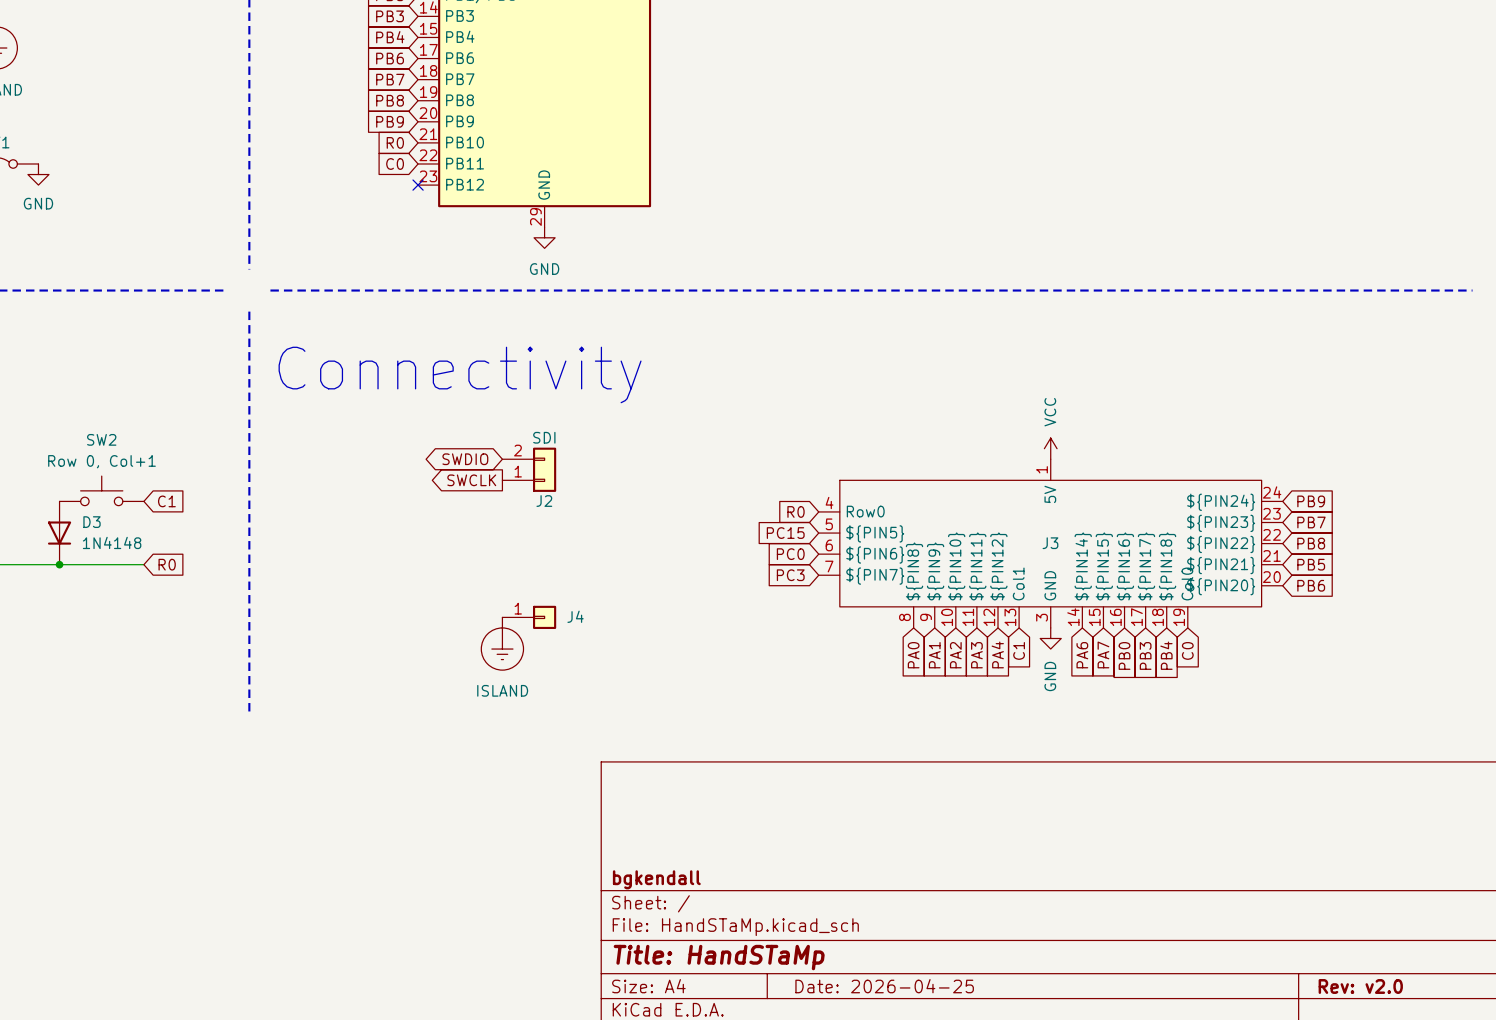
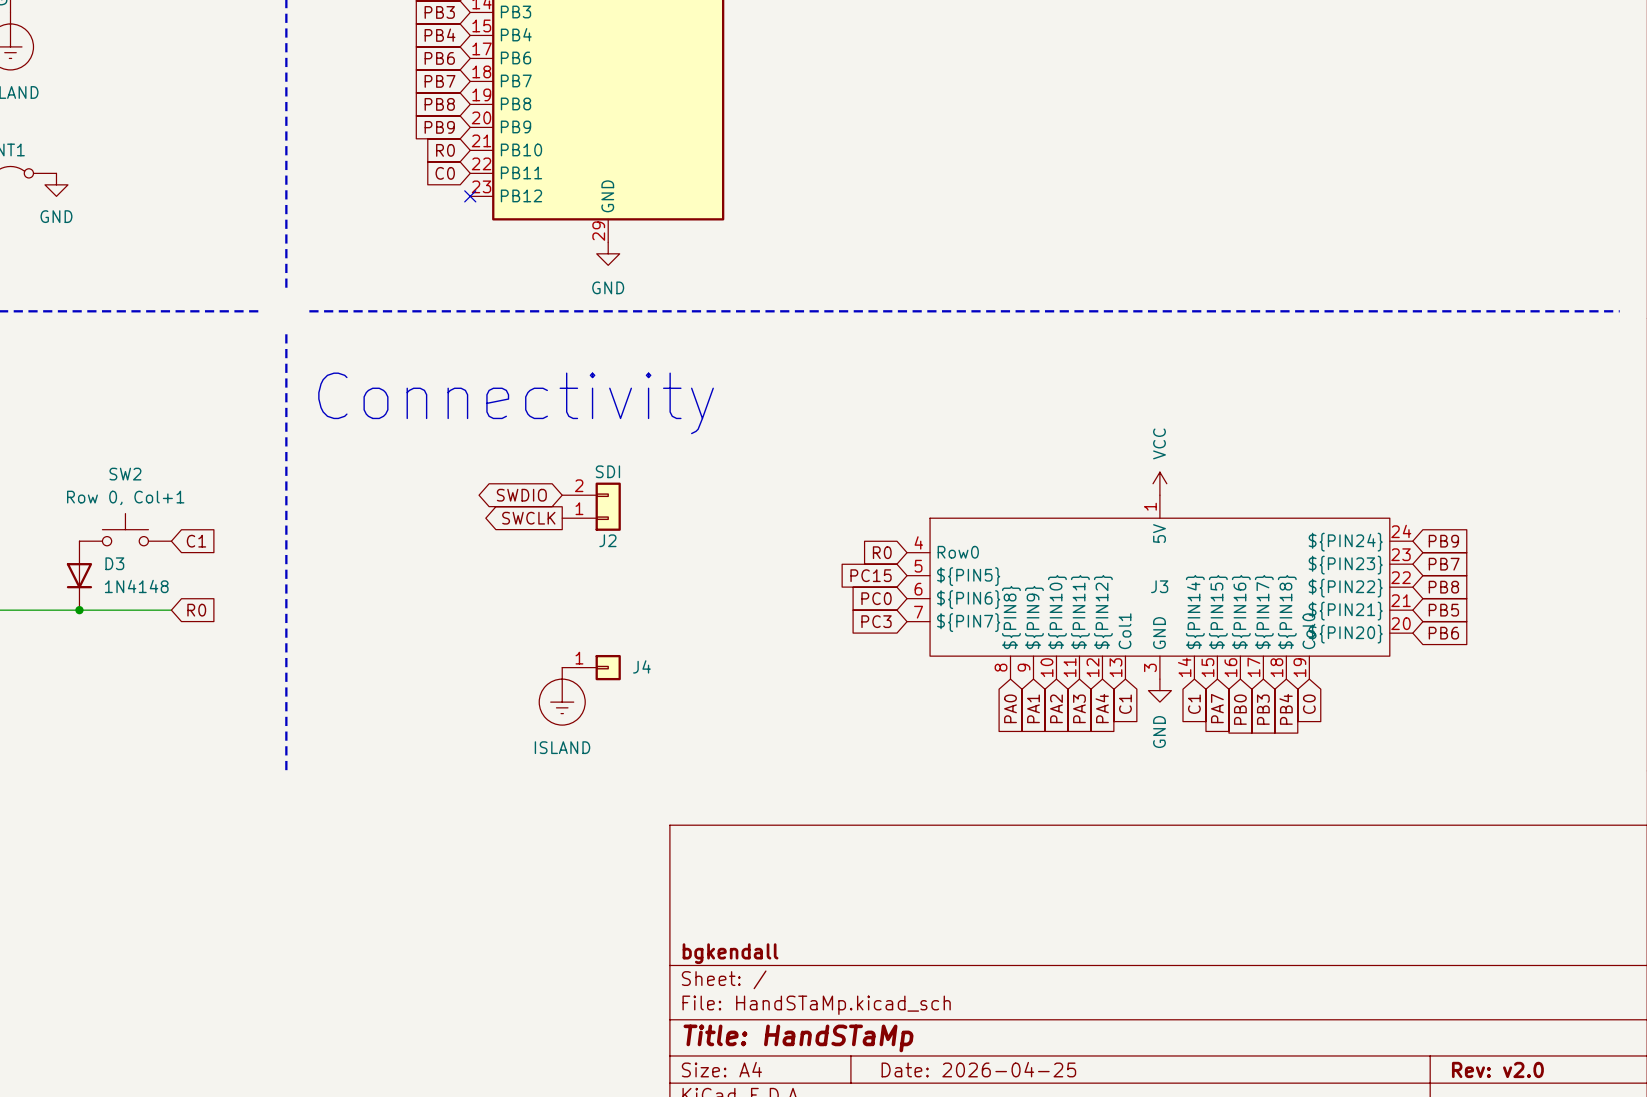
global label: PA6 (1082, 655) -> C1 (1194, 704)

